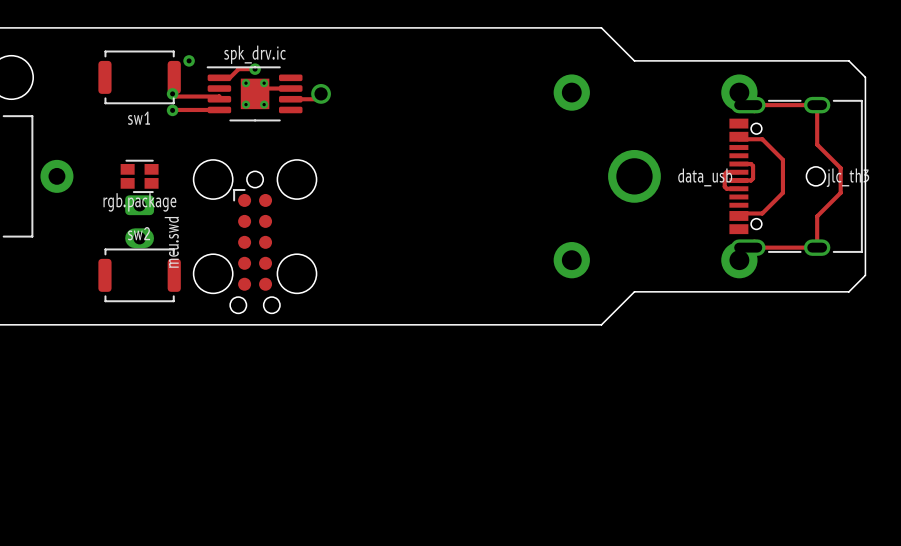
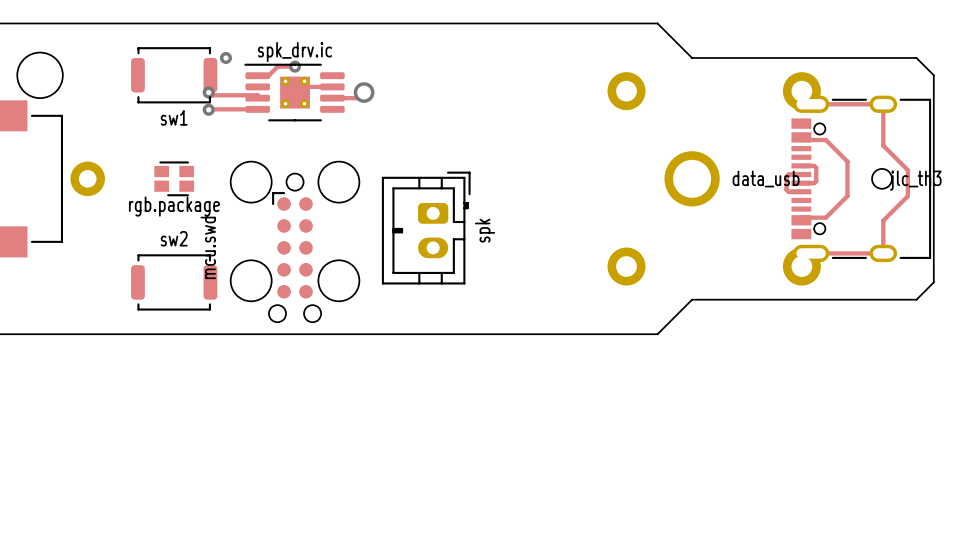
spk side: bottom (139, 221) -> top (426, 228)

